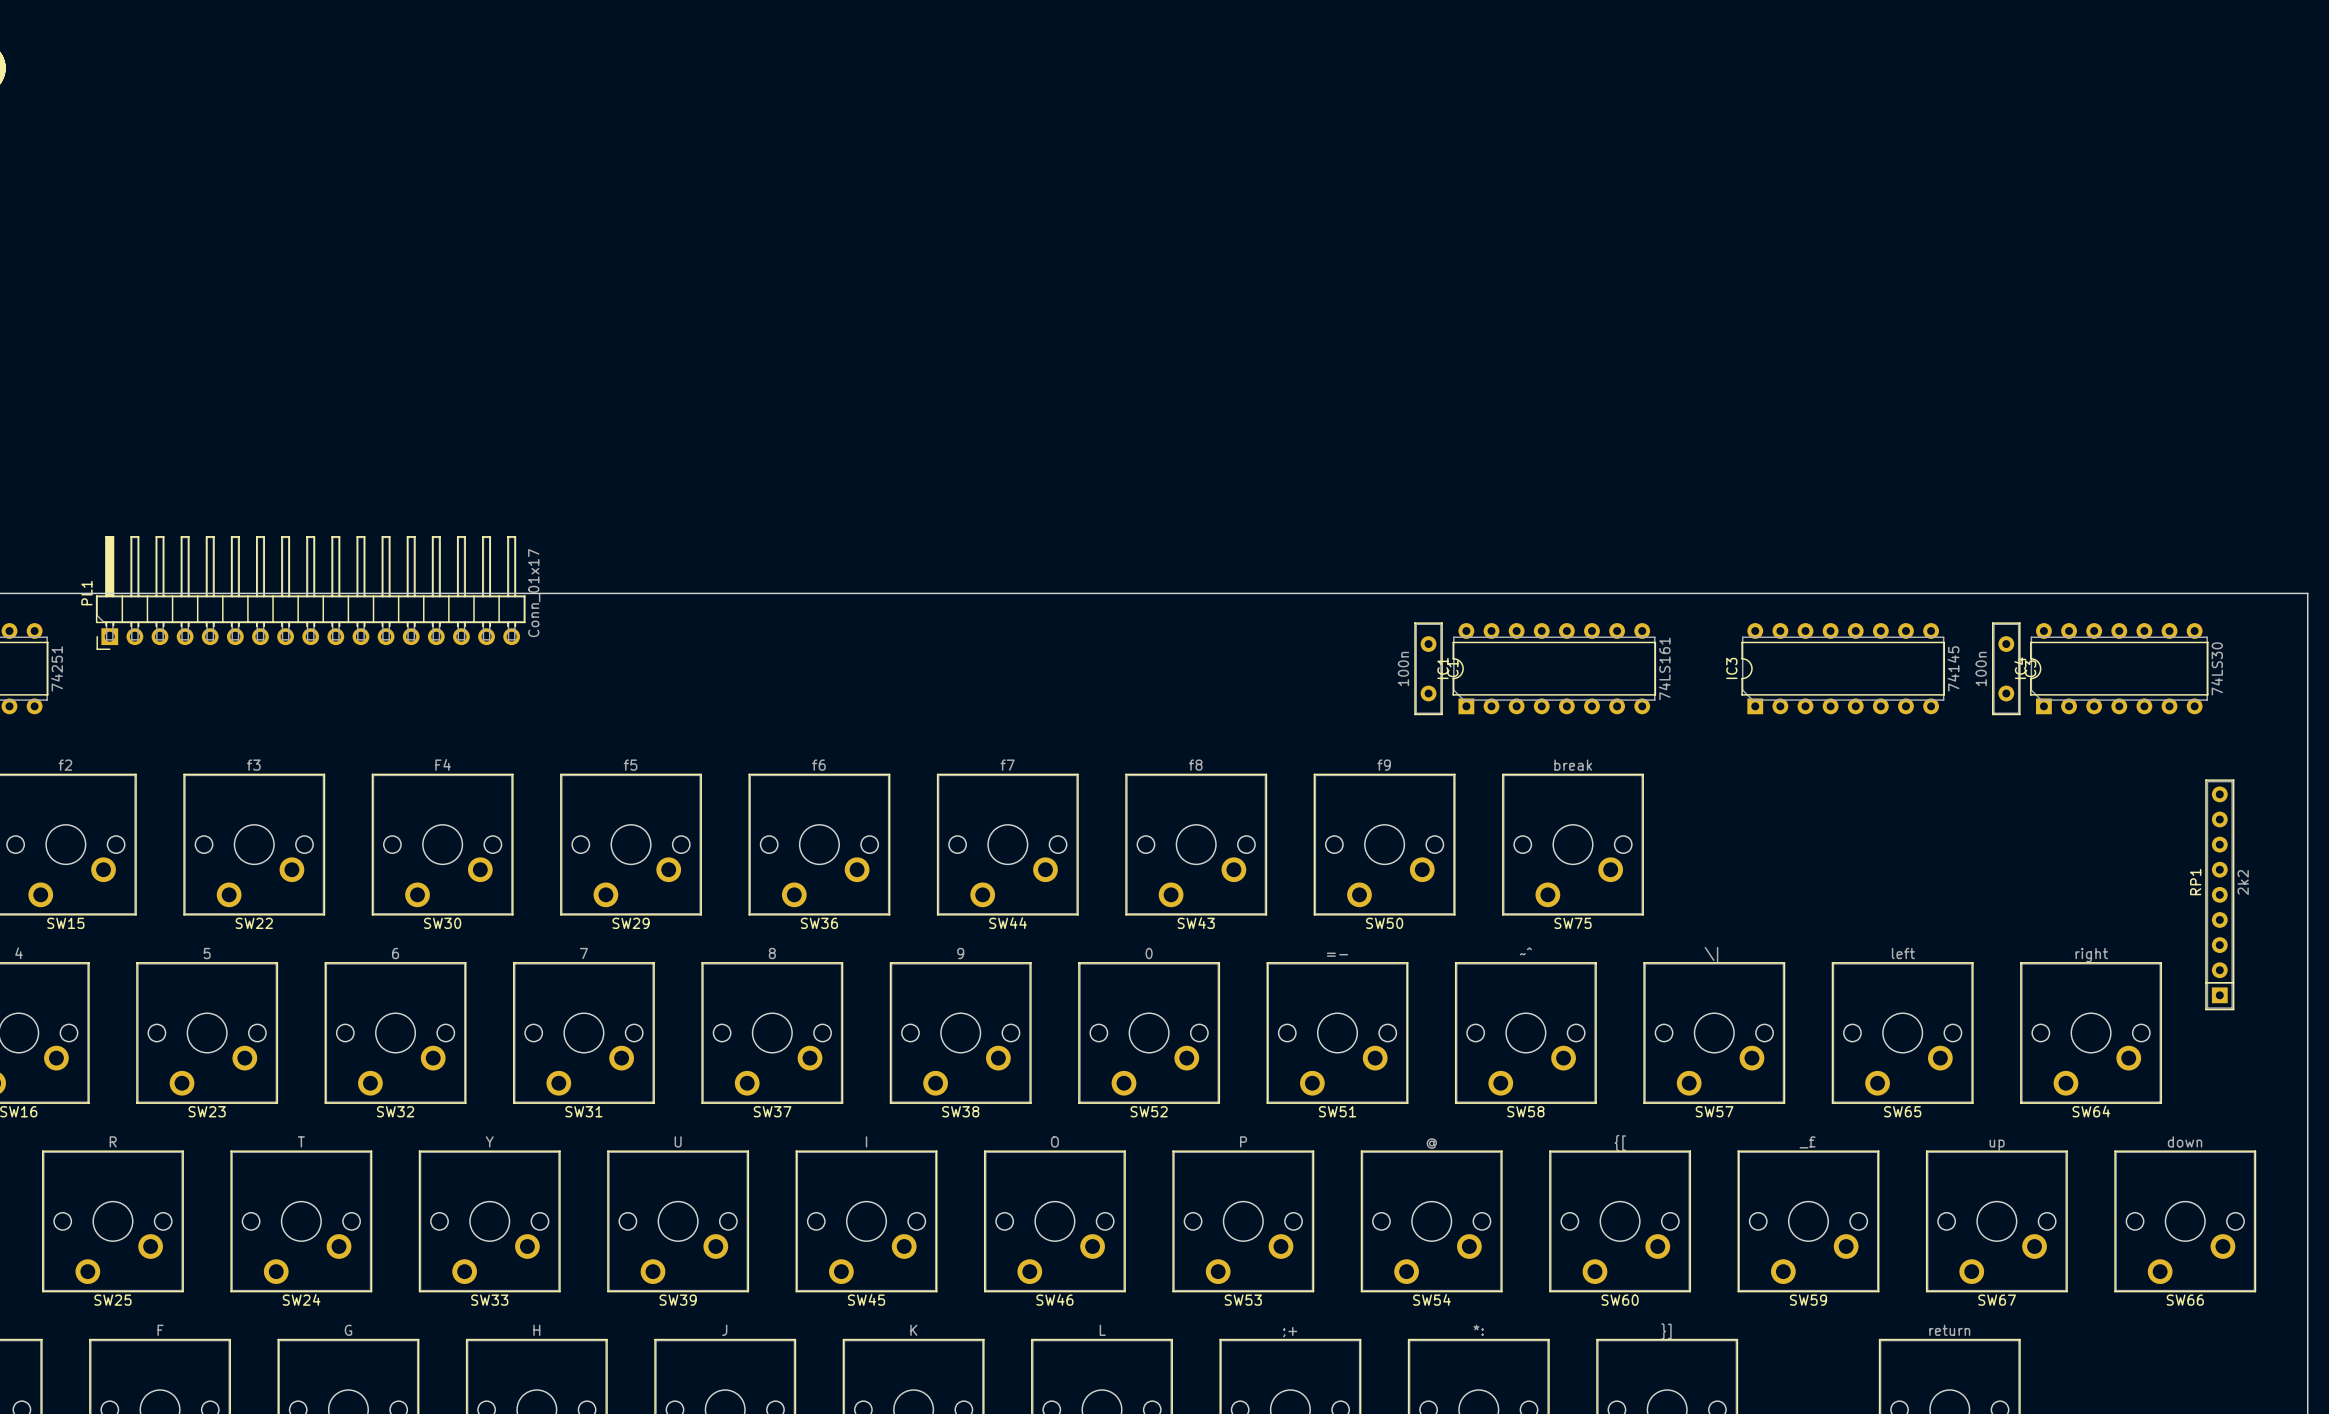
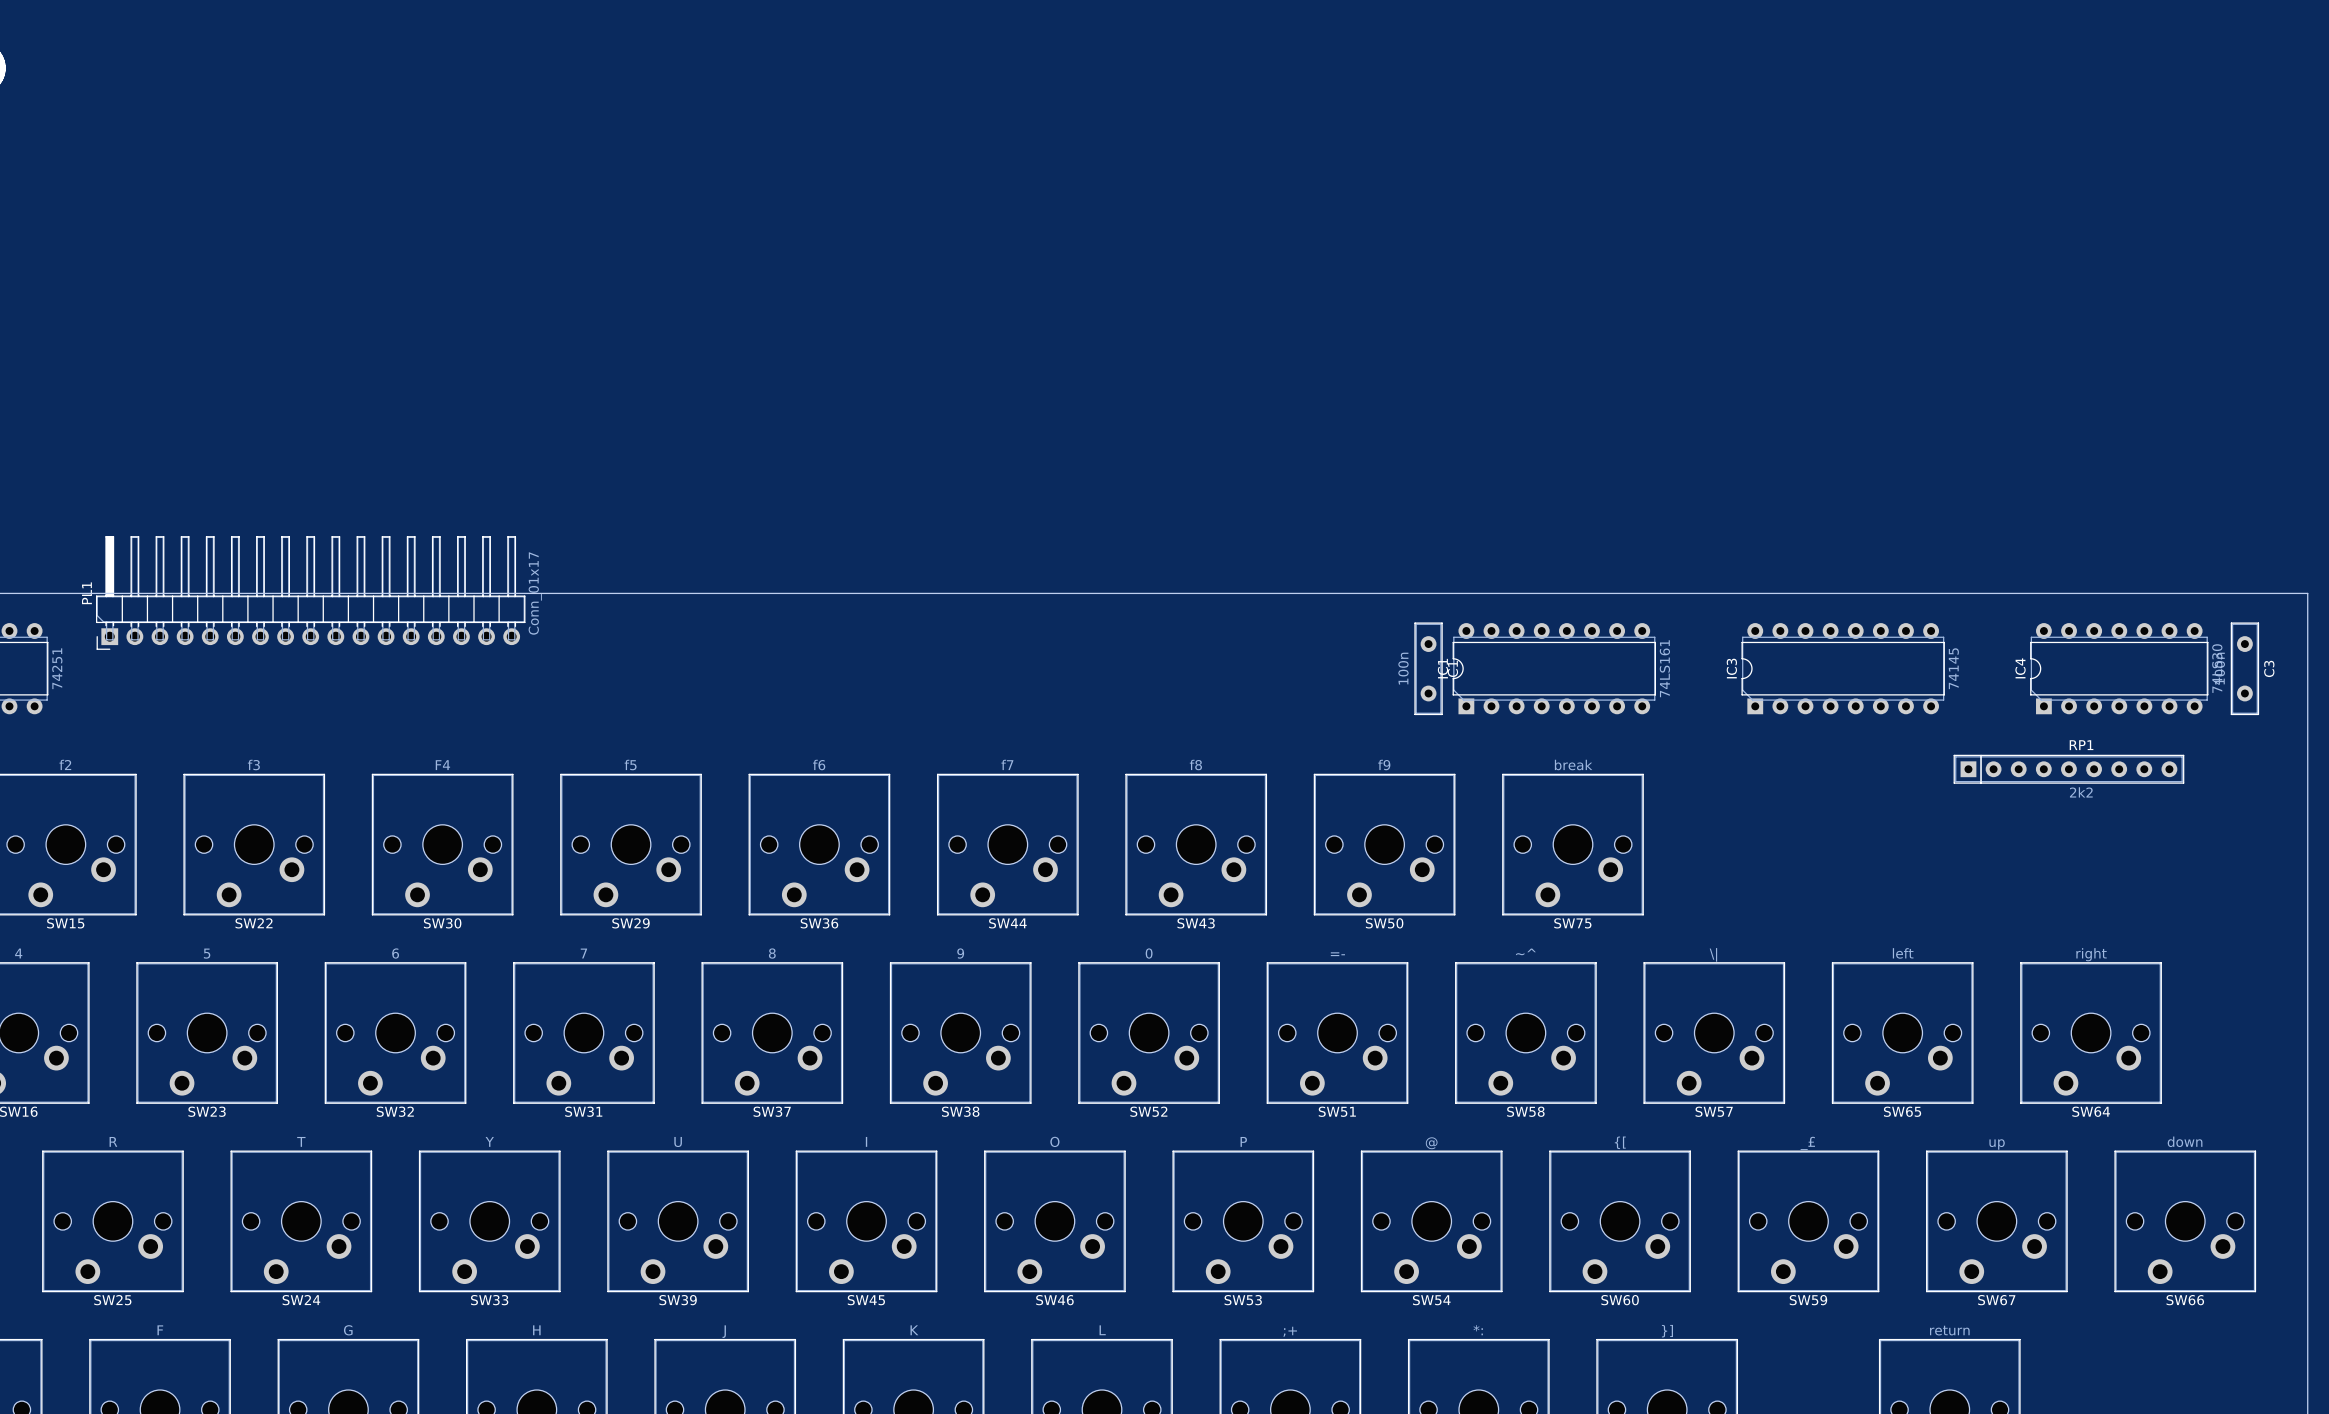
C3 position: (2006, 668) -> (2244, 668)
RP1 rotation: 0° (2219, 894) -> 90° clockwise (2068, 769)
RP1 position: (2219, 894) -> (2068, 769)

